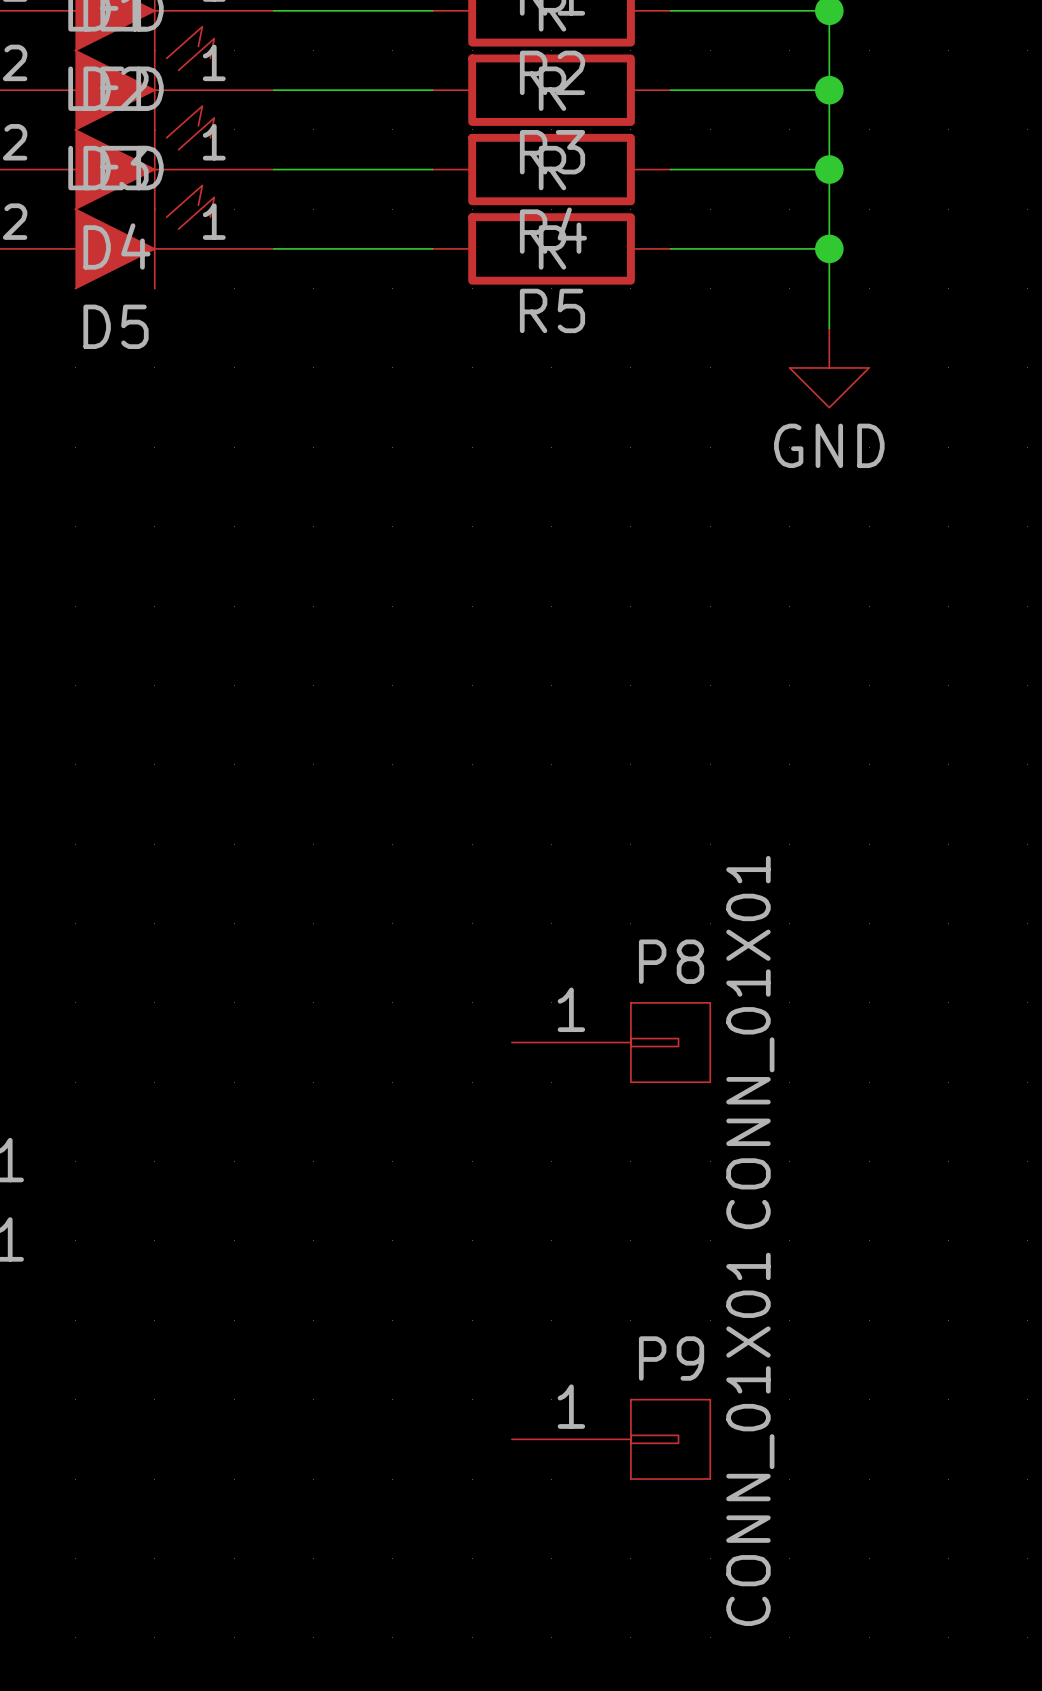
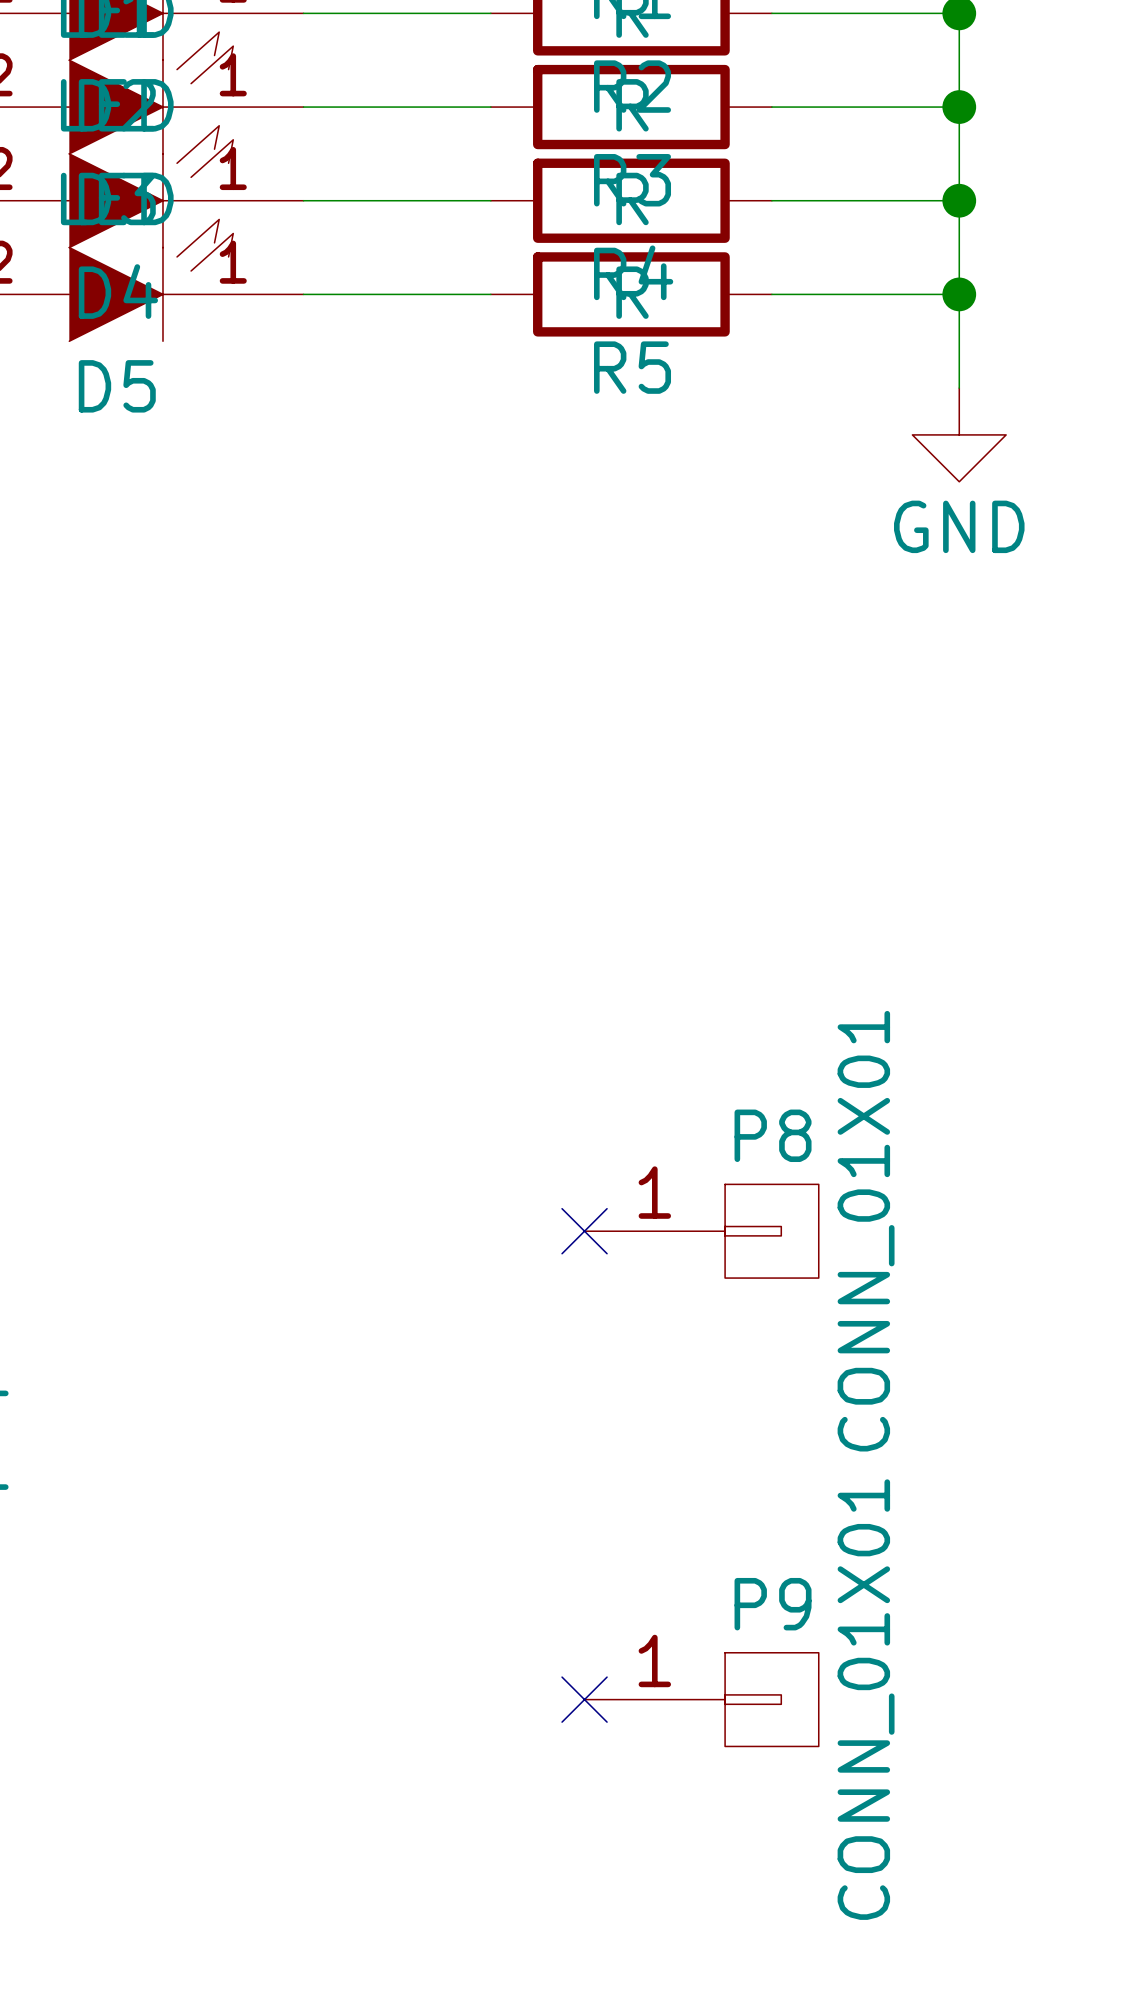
no-connect mark: none -> (584, 1231)
no-connect mark: none -> (584, 1699)

